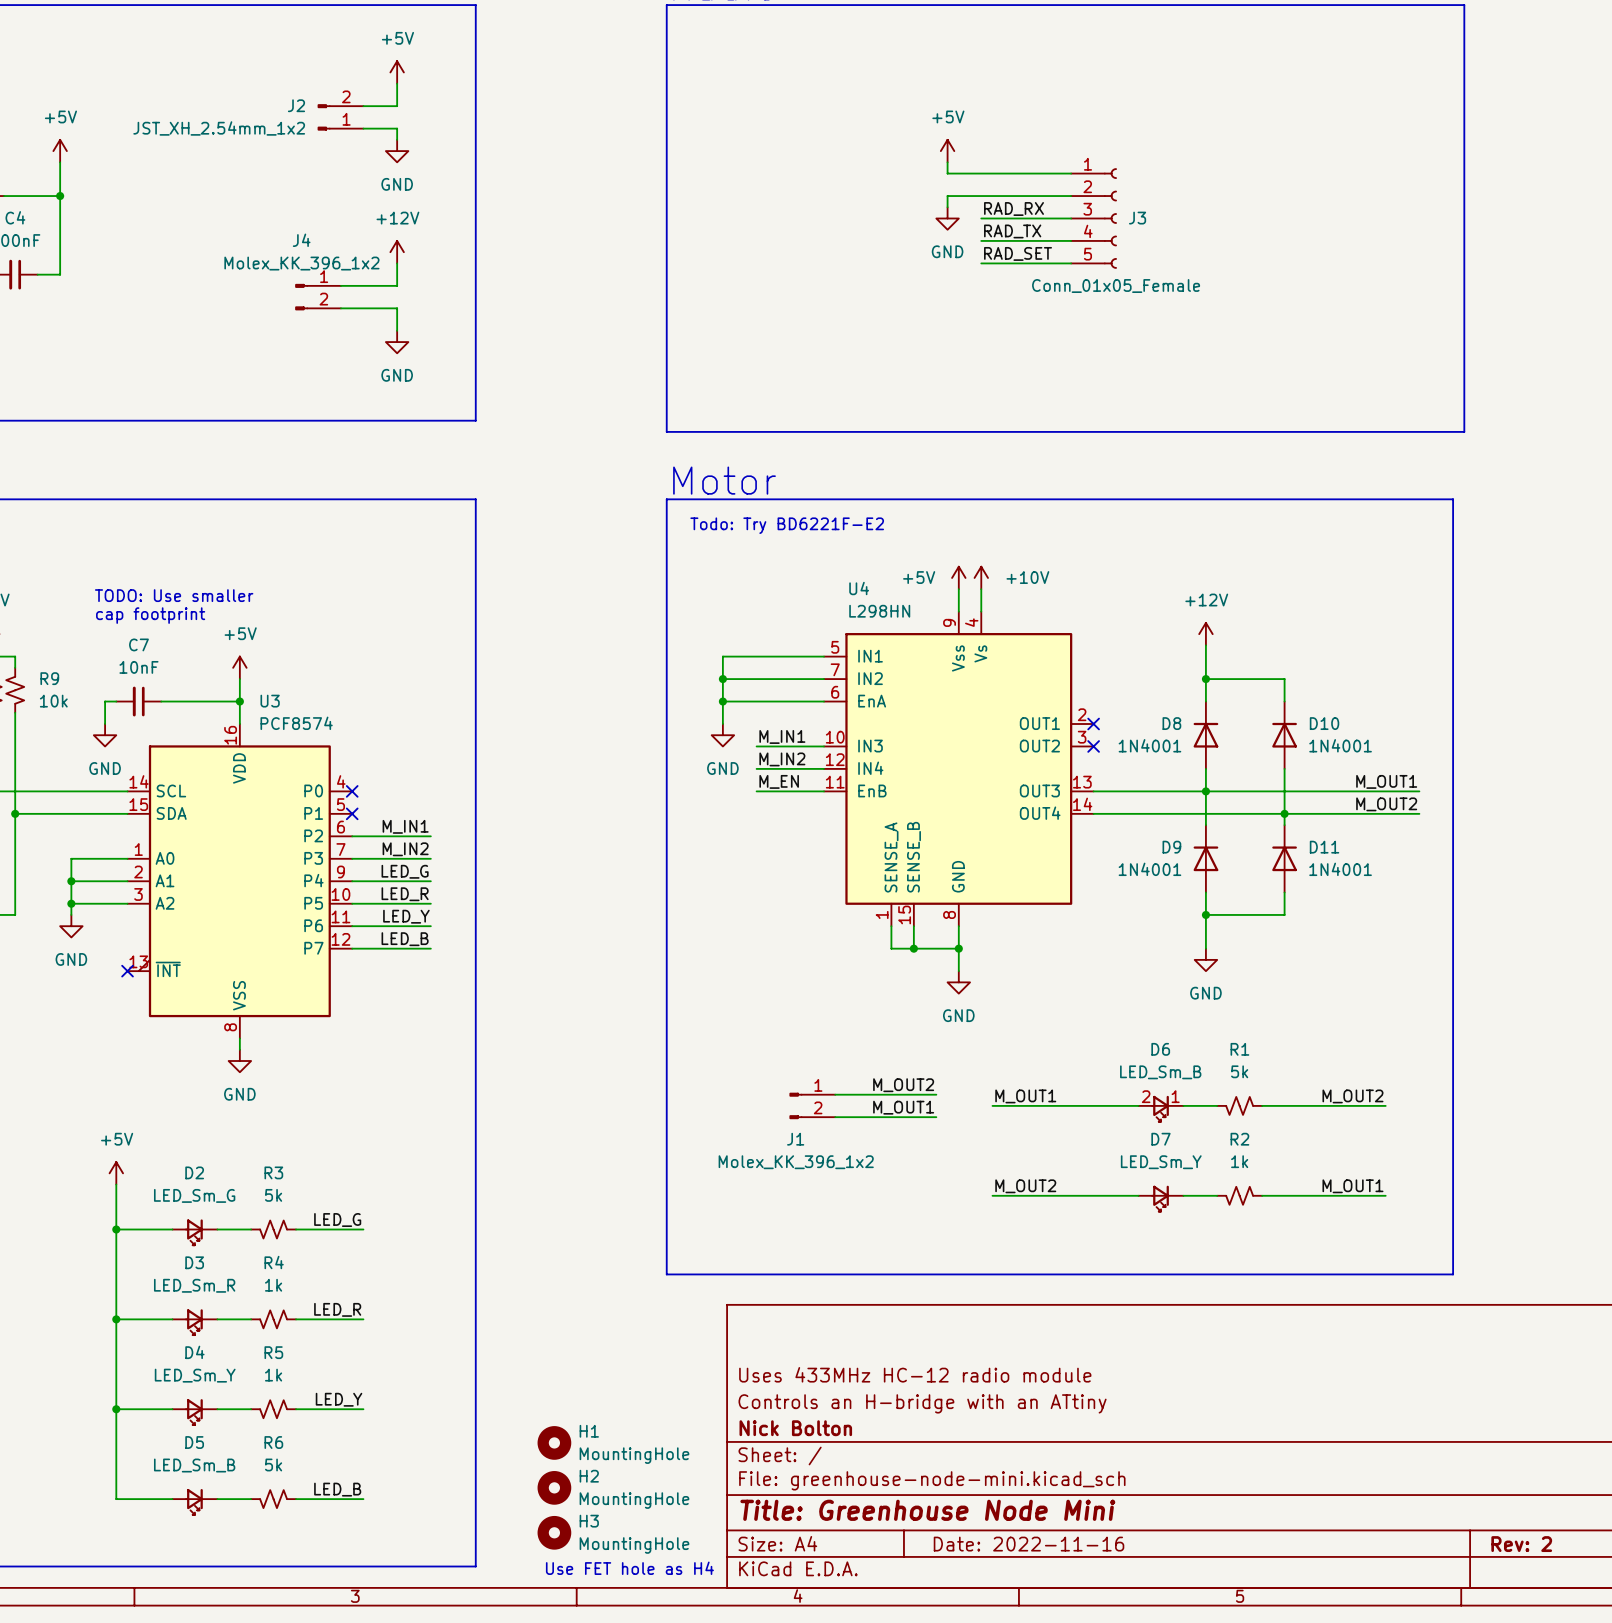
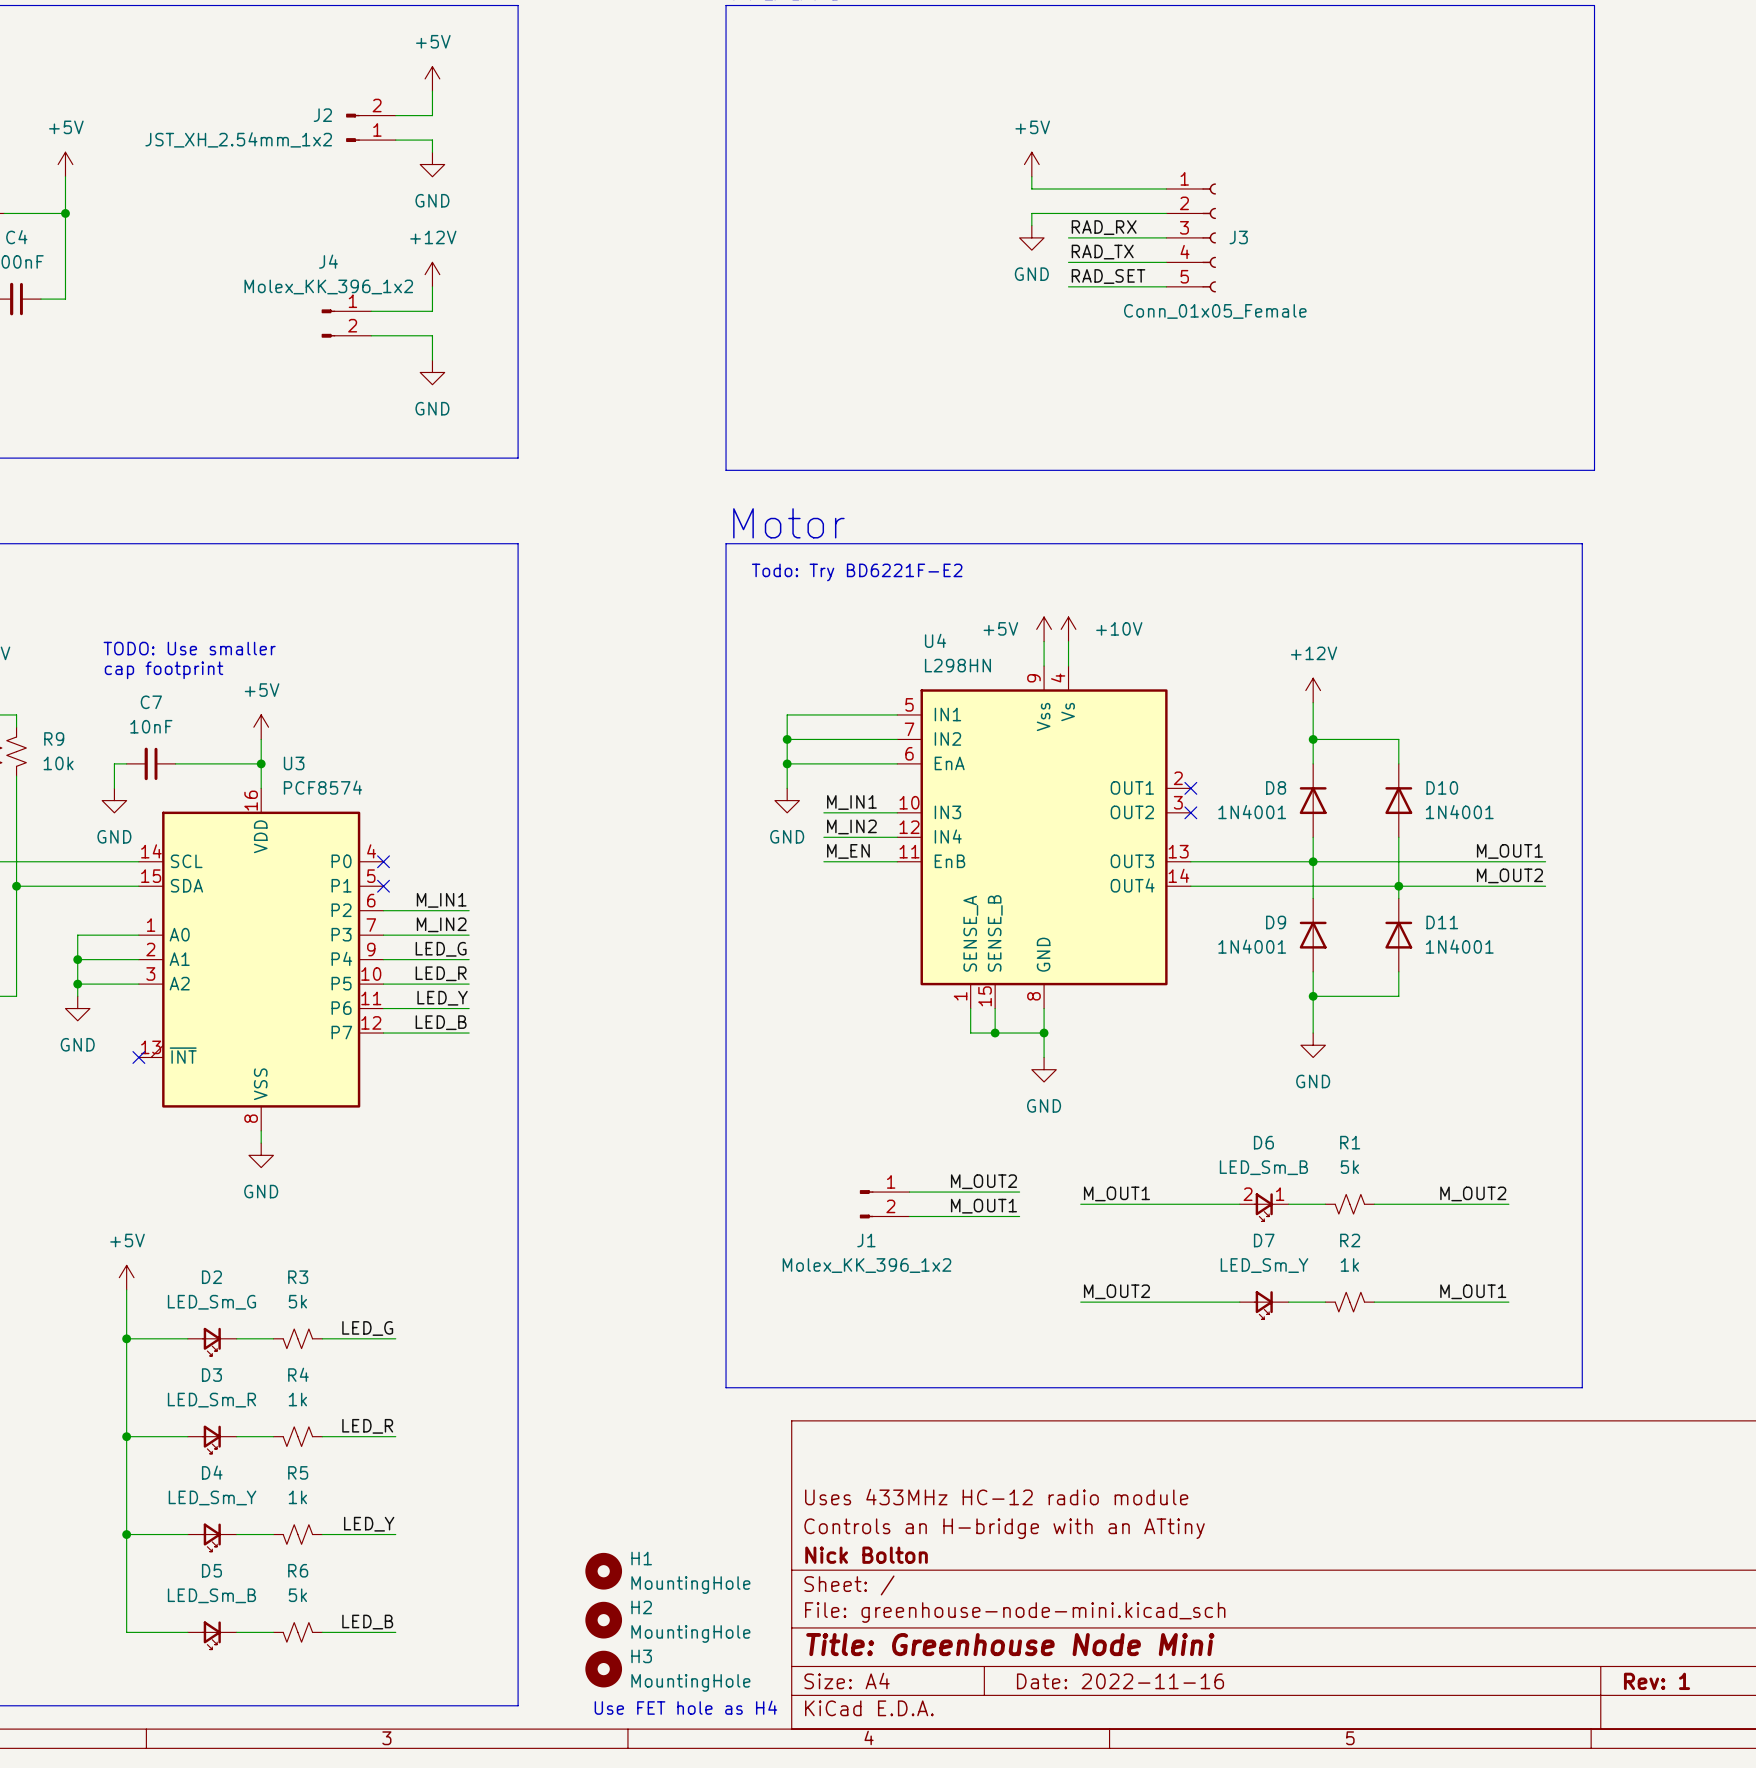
title block: Rev: 2 (1521, 1544) -> Rev: 1 (1657, 1681)

